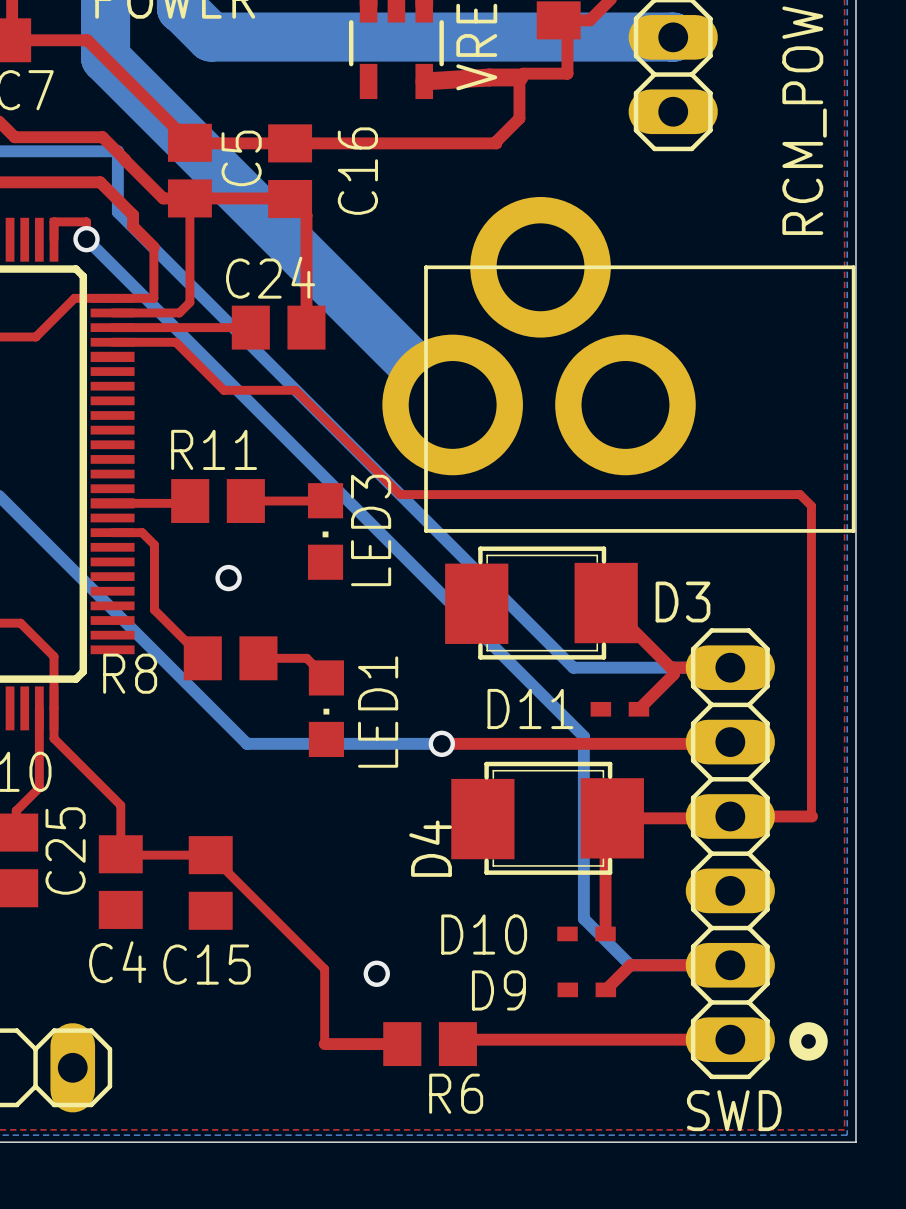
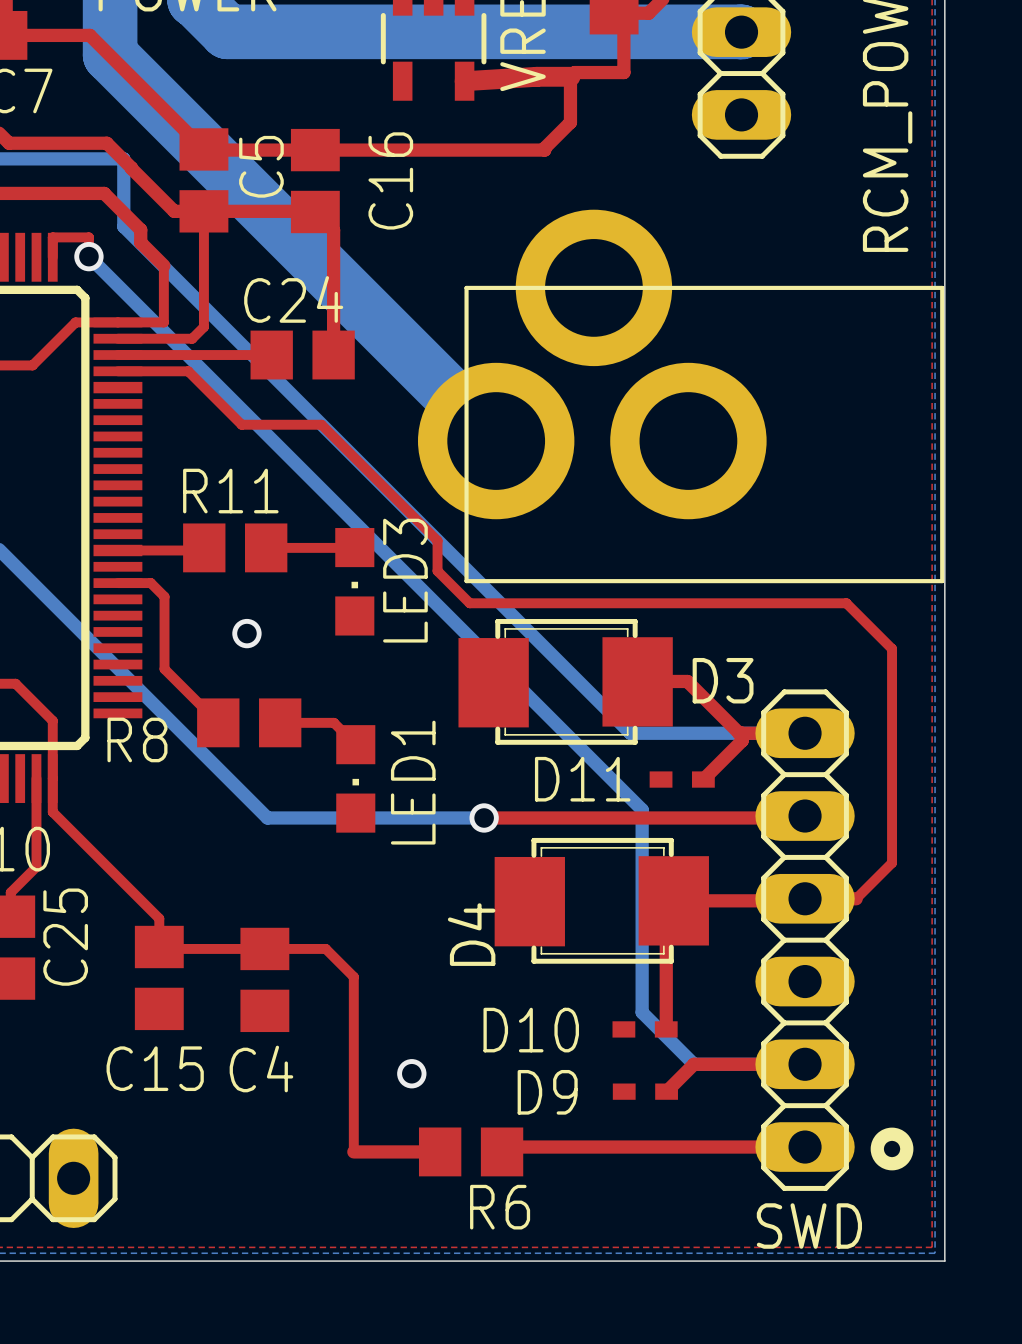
top track: (399, 494) (800, 494) (811, 506) (812, 816) (776, 816) -> (437, 540) (437, 571) (469, 603) (846, 603) (892, 648) (892, 862) (856, 898)
D3 position: (541, 603) -> (565, 681)
top track: (606, 603) (670, 667) -> (638, 681) (687, 681) (738, 732)
top track: (120, 805) (121, 855) (210, 855) (324, 969) -> (127, 886) (159, 918) (159, 947) (161, 948) (325, 948) (353, 976) (353, 1068)
C4 position: (120, 882) -> (264, 979)
C15 position: (210, 882) -> (159, 977)

